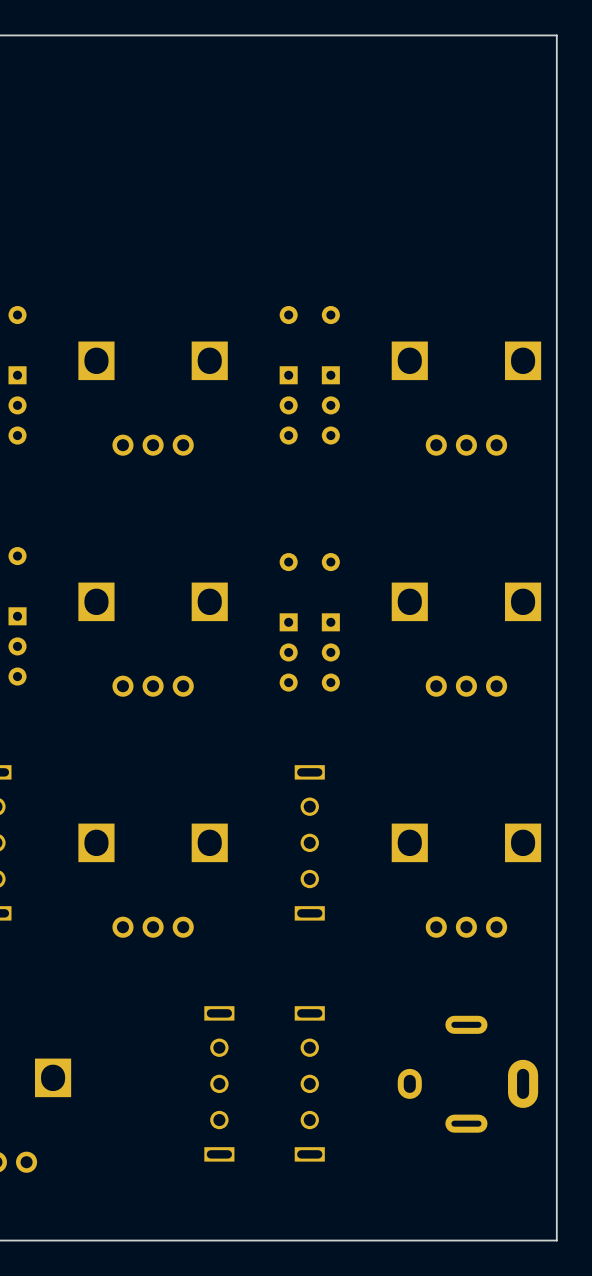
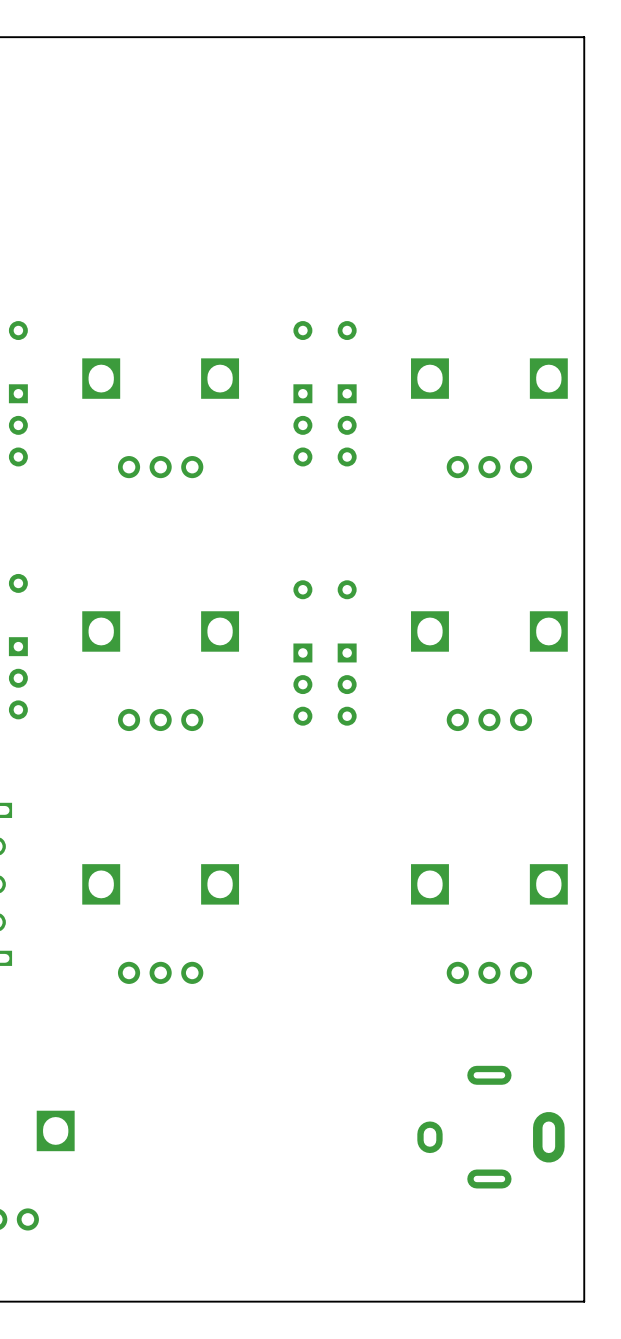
part: (309, 842) -> none
part: (219, 1083) -> none
part: (309, 1083) -> none

